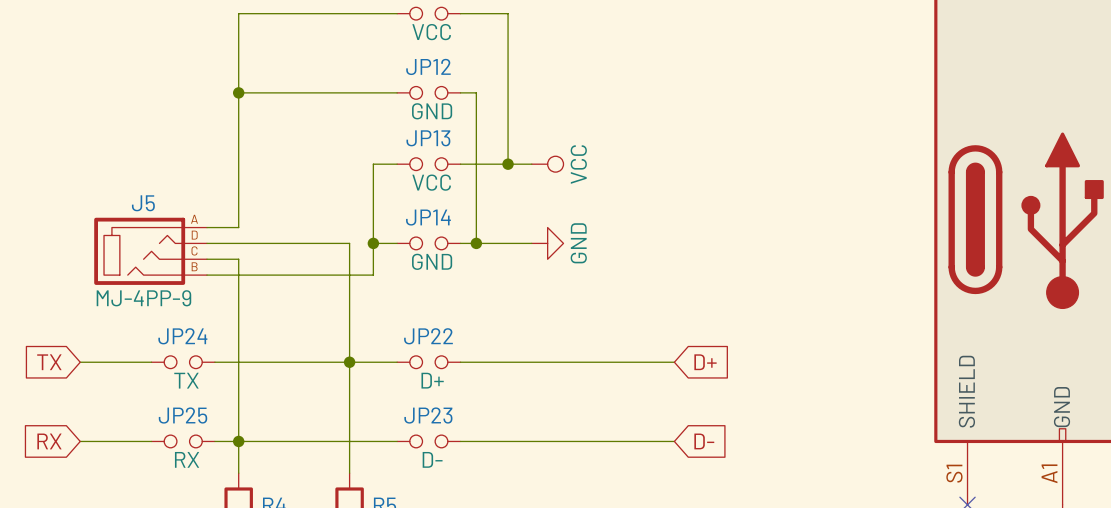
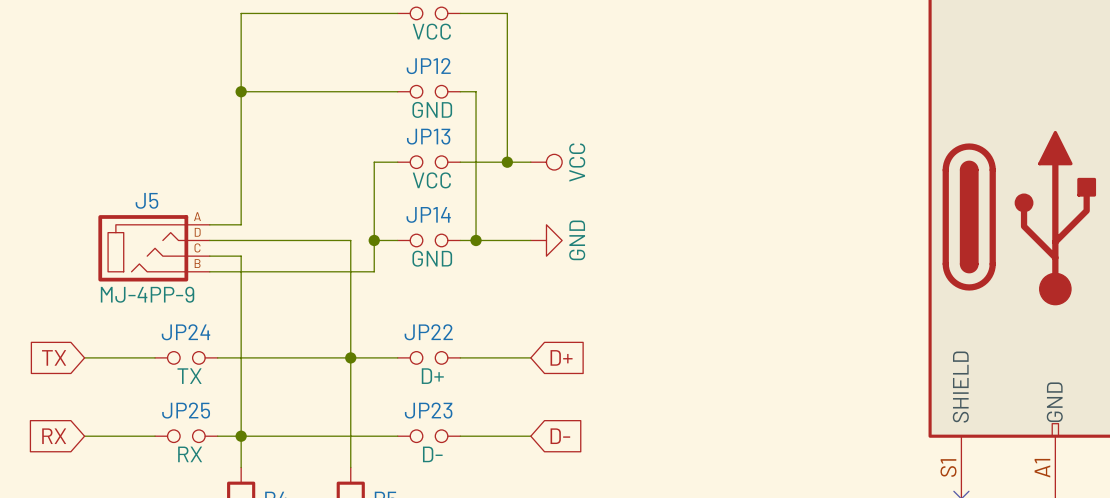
wire: (531, 362) (674, 362) -> none
global label position: D+ (705, 362) -> D+ (561, 357)
wire: (531, 441) (674, 441) -> none
global label position: D- (704, 441) -> D- (560, 436)

